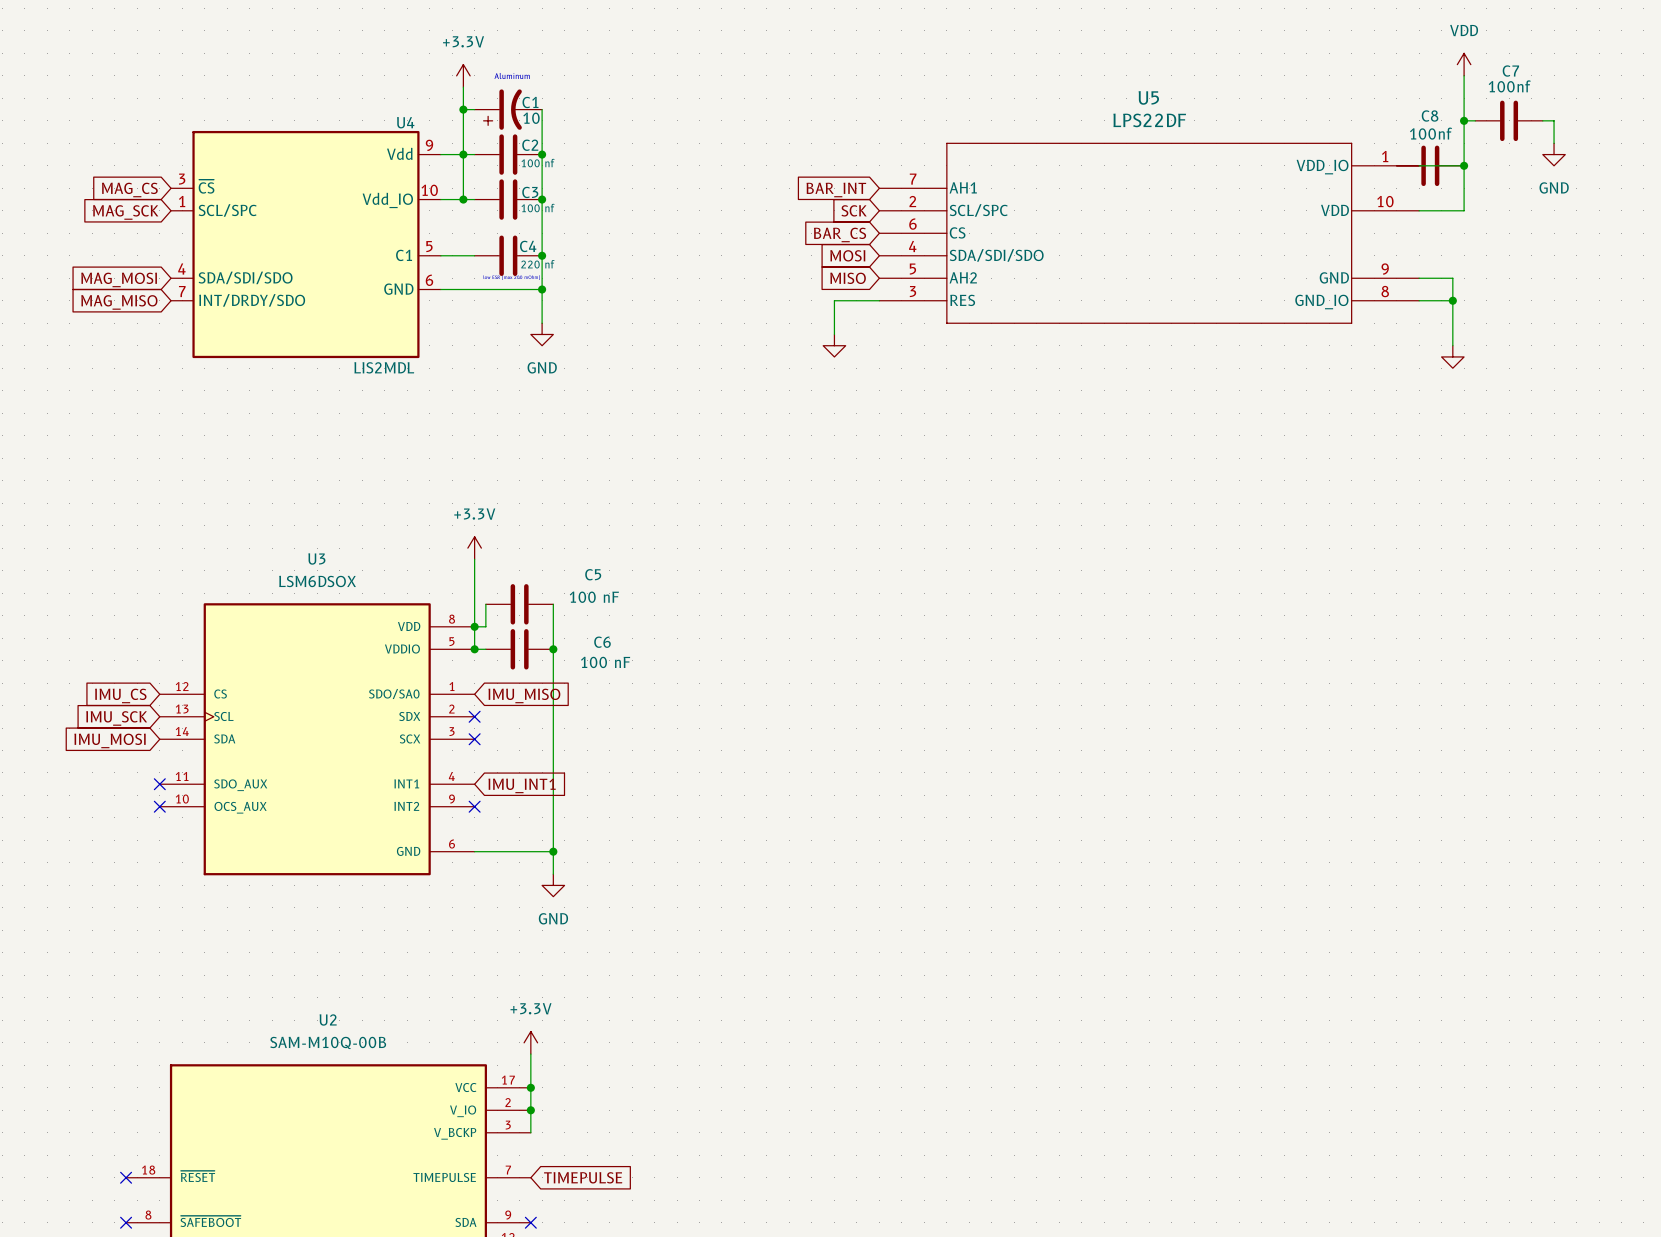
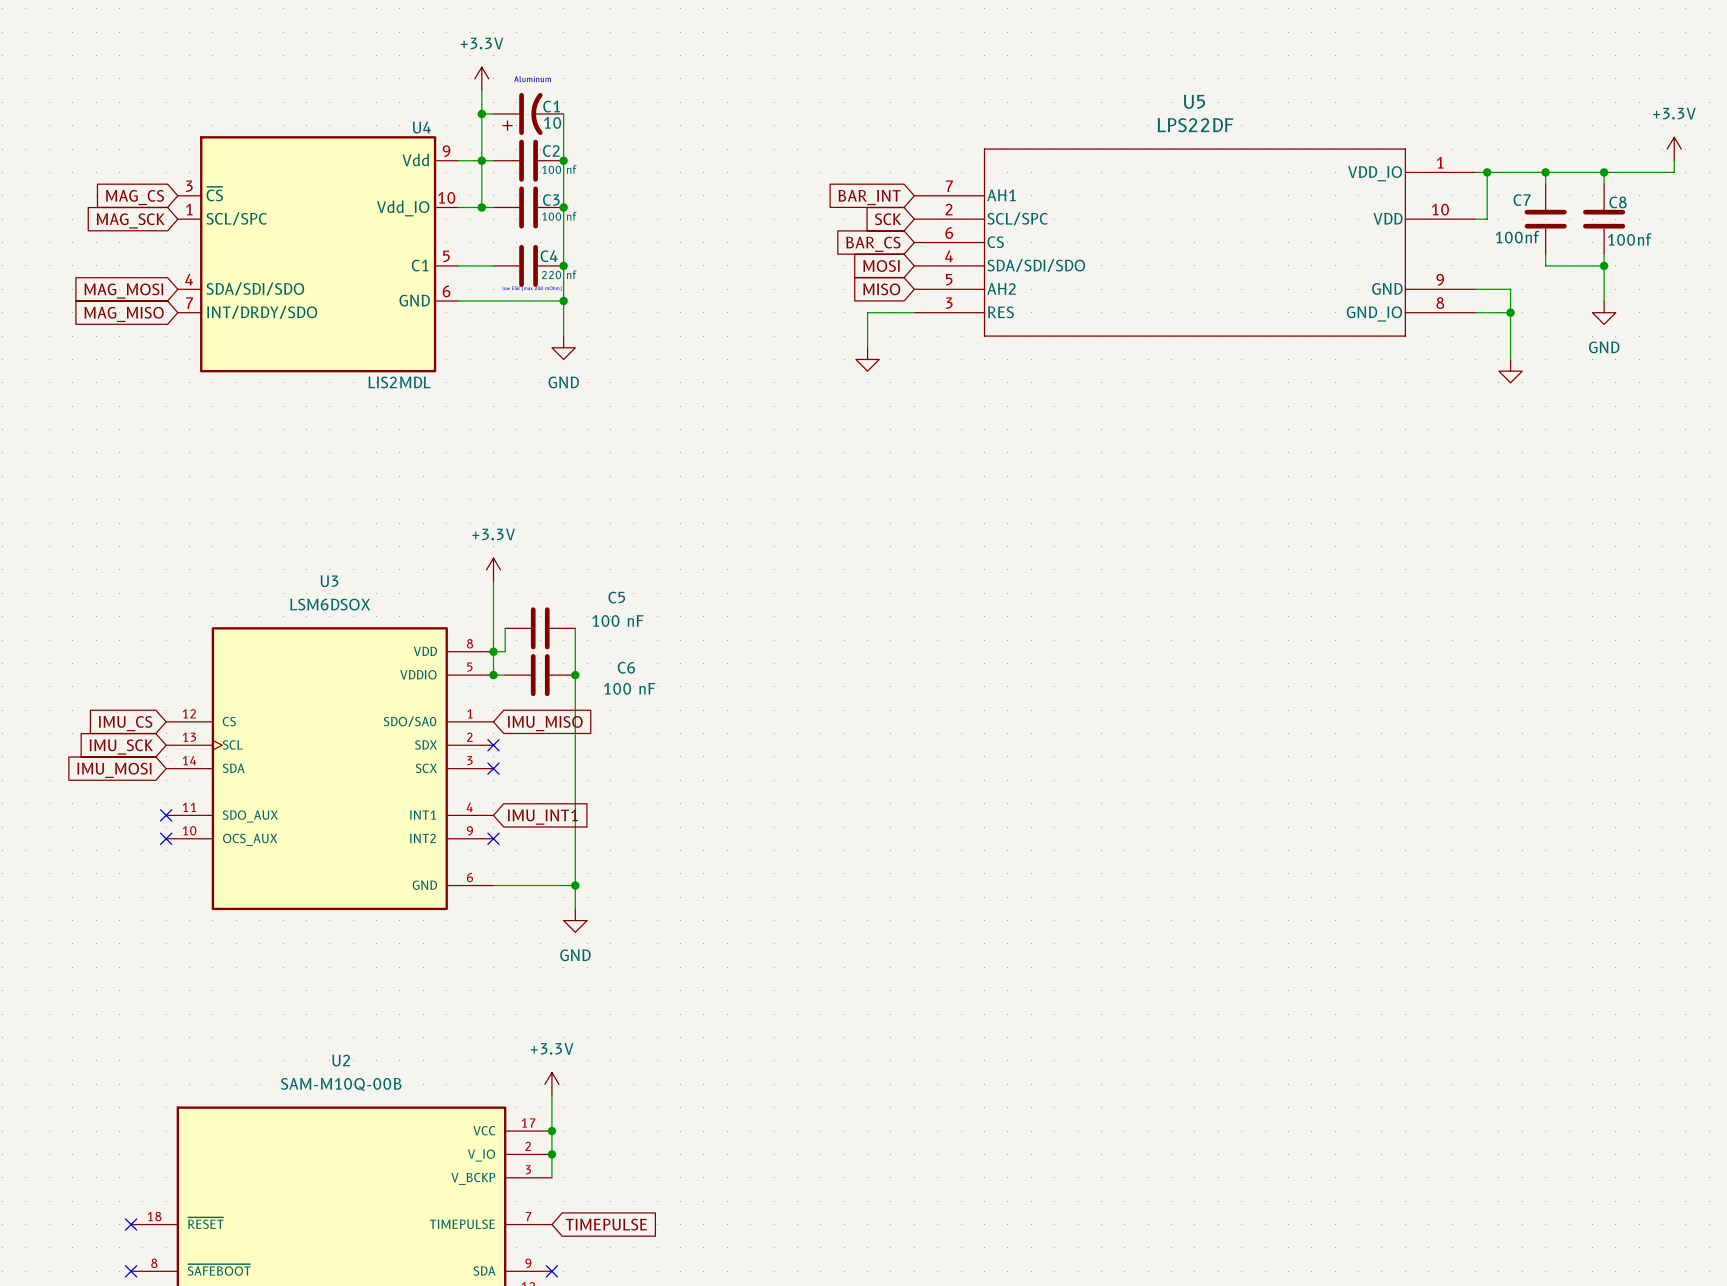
power symbol: VDD (1464, 64) -> none
C7 name position: C7 (1510, 71) -> C7 (1522, 200)
wire: (1464, 75) (1464, 210) (1430, 210) -> (1487, 172) (1487, 219)
C7 value position: 100nf (1509, 86) -> 100nf (1517, 237)
C8 name position: C8 (1430, 116) -> C8 (1618, 202)
wire: (1464, 120) (1475, 120) -> none
junction: (1464, 120) -> none
C7 rotation: 0° (1509, 120) -> 90° clockwise (1545, 219)
C7 position: (1509, 120) -> (1545, 219)
wire: (1542, 120) (1554, 120) (1554, 143) -> none
C8 value position: 100nf (1431, 133) -> 100nf (1629, 239)
power symbol: none -> +3.3V (1674, 149)
power symbol position: GND (1554, 154) -> GND (1604, 312)
wire: none -> (1674, 160) (1674, 172) (1522, 172)
junction: none -> (1487, 172)
C8 rotation: 0° (1430, 165) -> 90° clockwise (1604, 219)
C8 position: (1430, 165) -> (1604, 219)
junction: (1464, 165) -> none
wire: none -> (1545, 172) (1545, 184)
junction: none -> (1545, 172)
wire: none -> (1604, 172) (1604, 184)
junction: none -> (1604, 172)
wire: none -> (1545, 254) (1545, 265) (1604, 265)
wire: none -> (1604, 254) (1604, 301)
junction: none -> (1604, 265)

